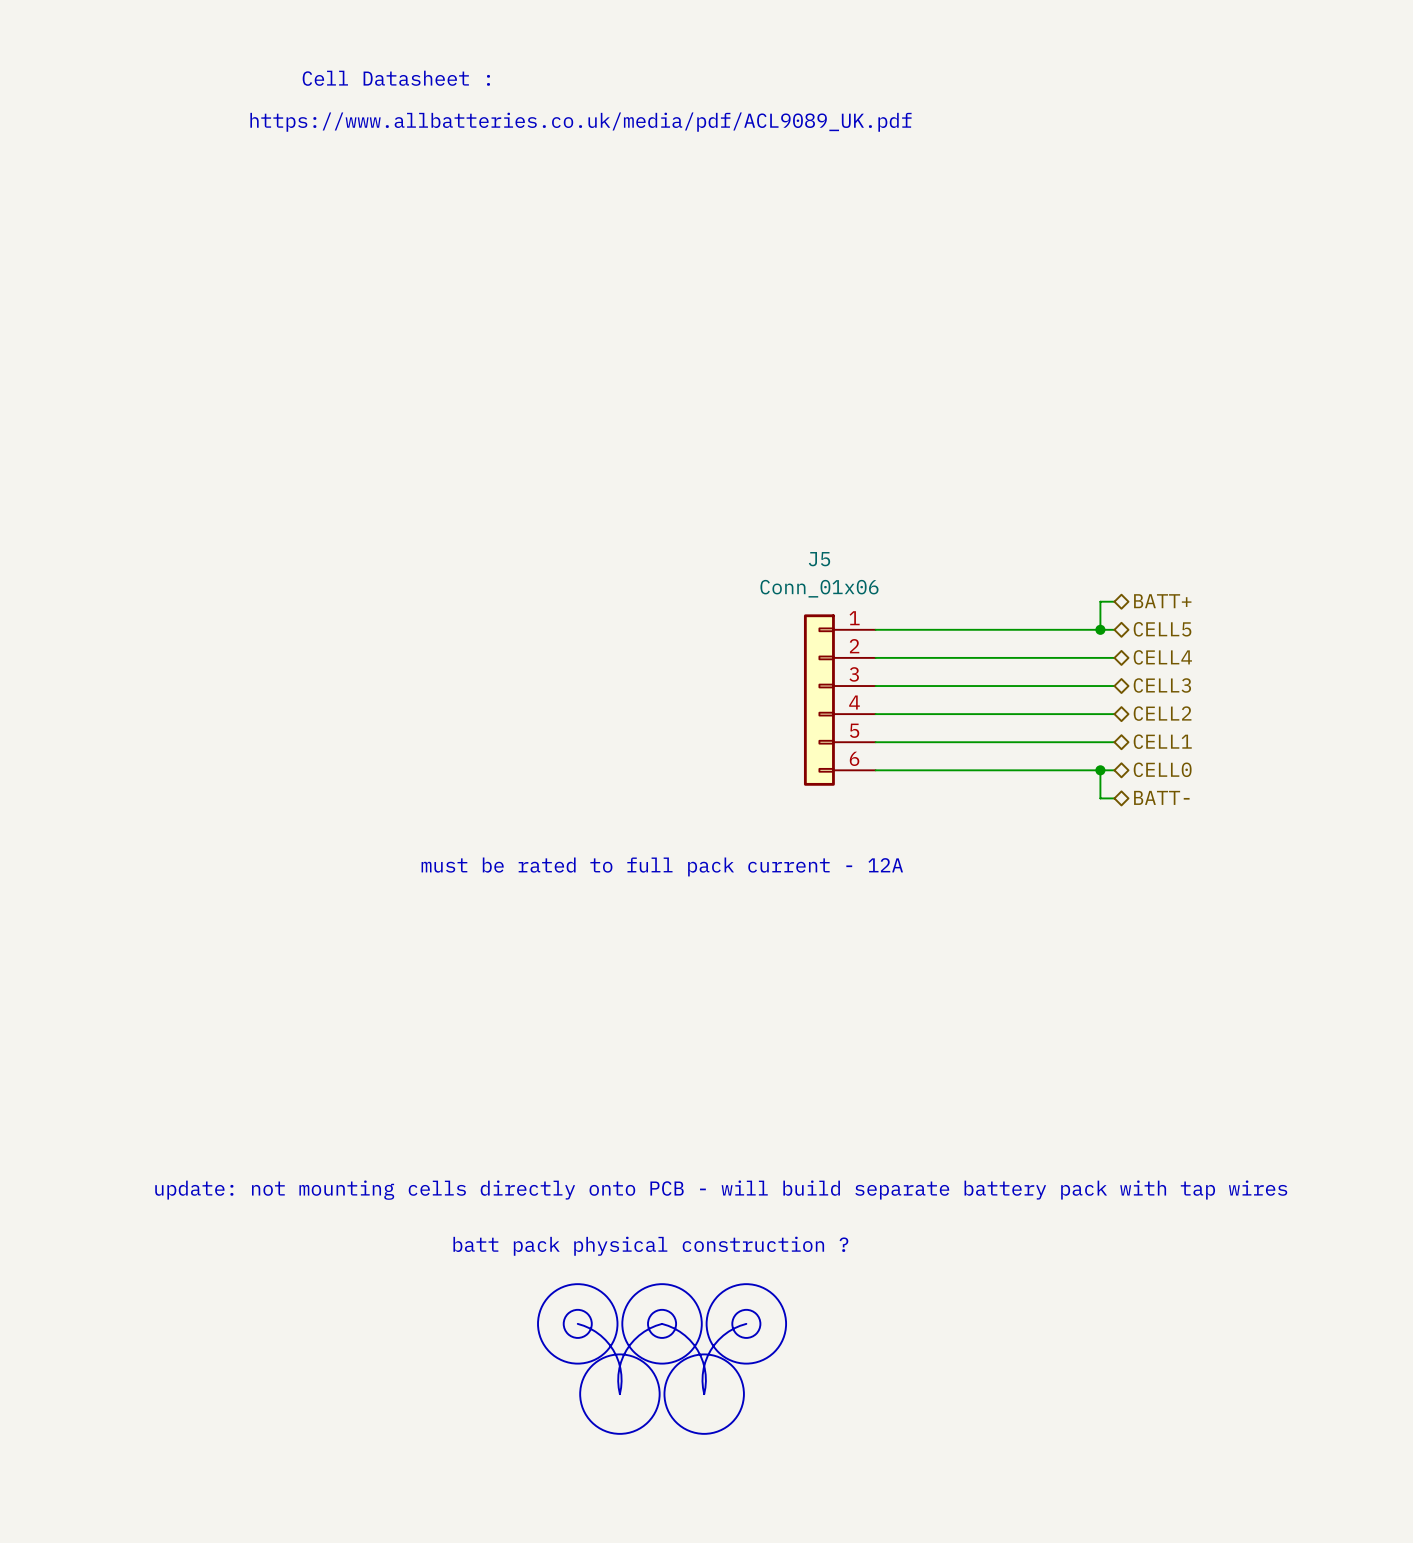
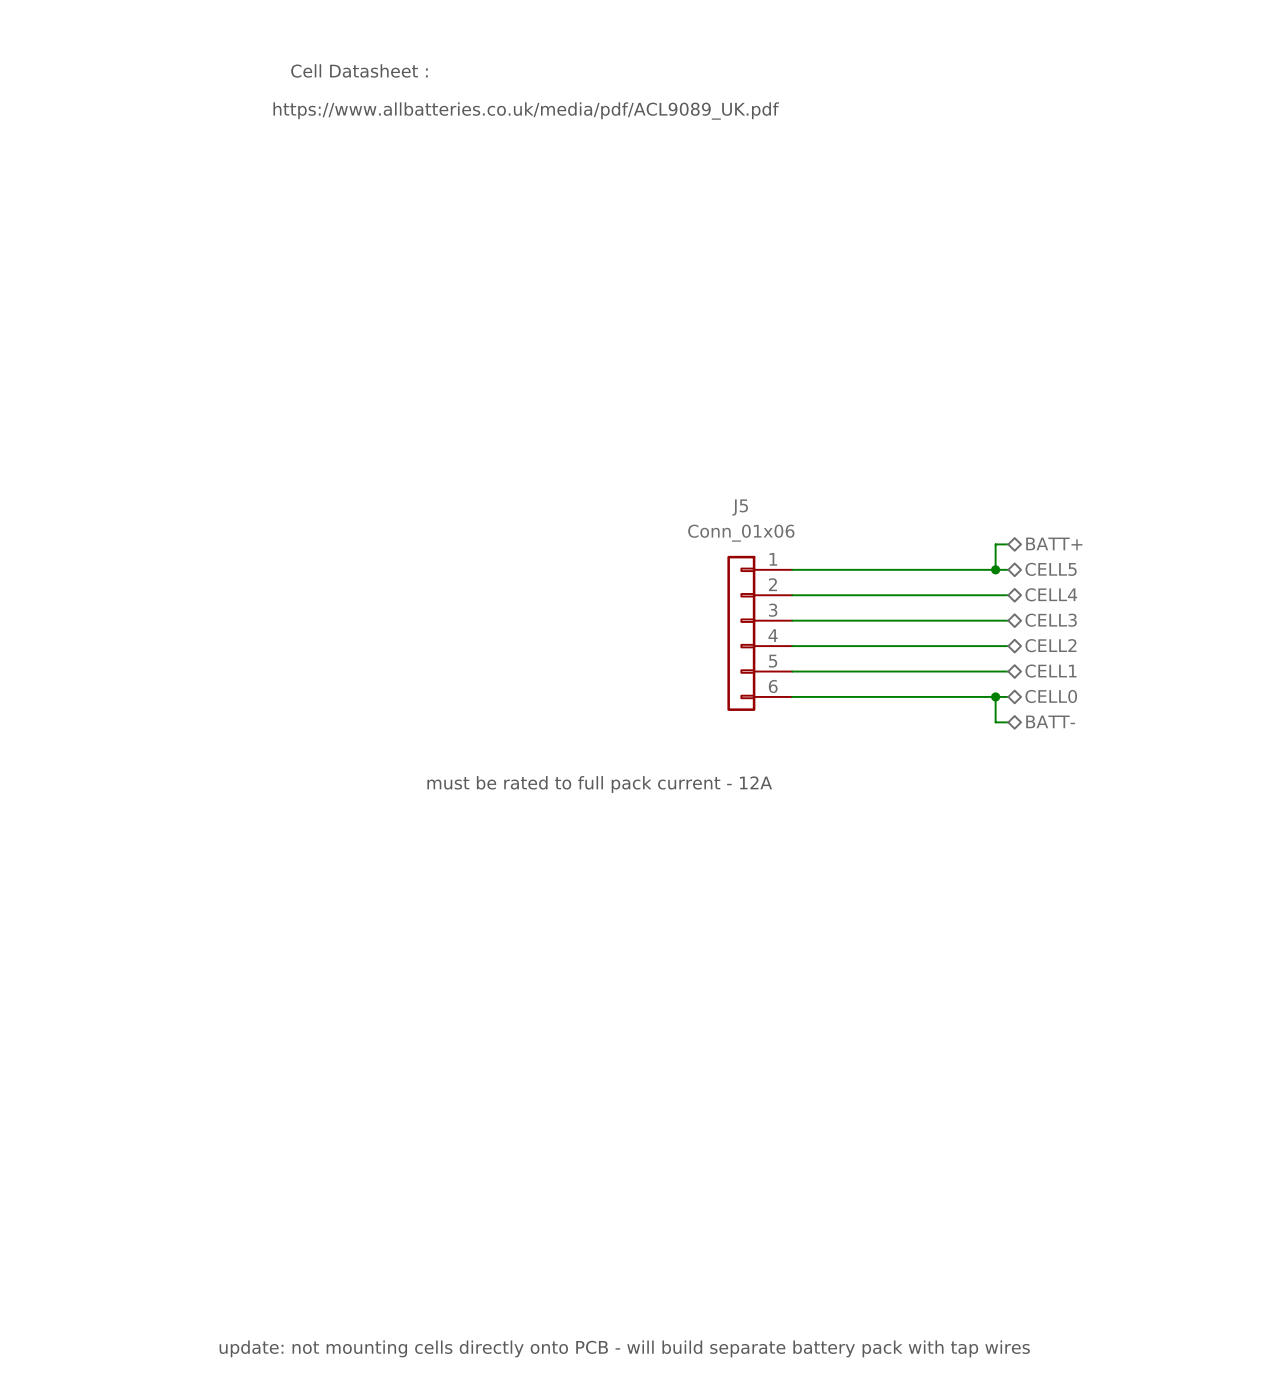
text: update: not mounting cells directly onto PCB - will build separate battery pack with tap wires (721, 1190) -> none
text: batt pack physical construction ? (650, 1246) -> none
drawing: [538, 1284, 787, 1434] -> none
line: (577, 1323) (595, 1331) (613, 1350) (616, 1356) (618, 1362) (620, 1368) (619, 1394) (618, 1374) (619, 1368) (621, 1362) (623, 1356) (634, 1339) (649, 1328) (662, 1323) (668, 1325) (685, 1335) (694, 1344) (700, 1356) (703, 1362) (704, 1368) (704, 1394) (702, 1374) (703, 1368) (705, 1362) (710, 1350) (723, 1335) (746, 1323) -> none
text: none -> update: not mounting cells directly onto PCB - will build separate battery pack with tap wires (624, 1348)

